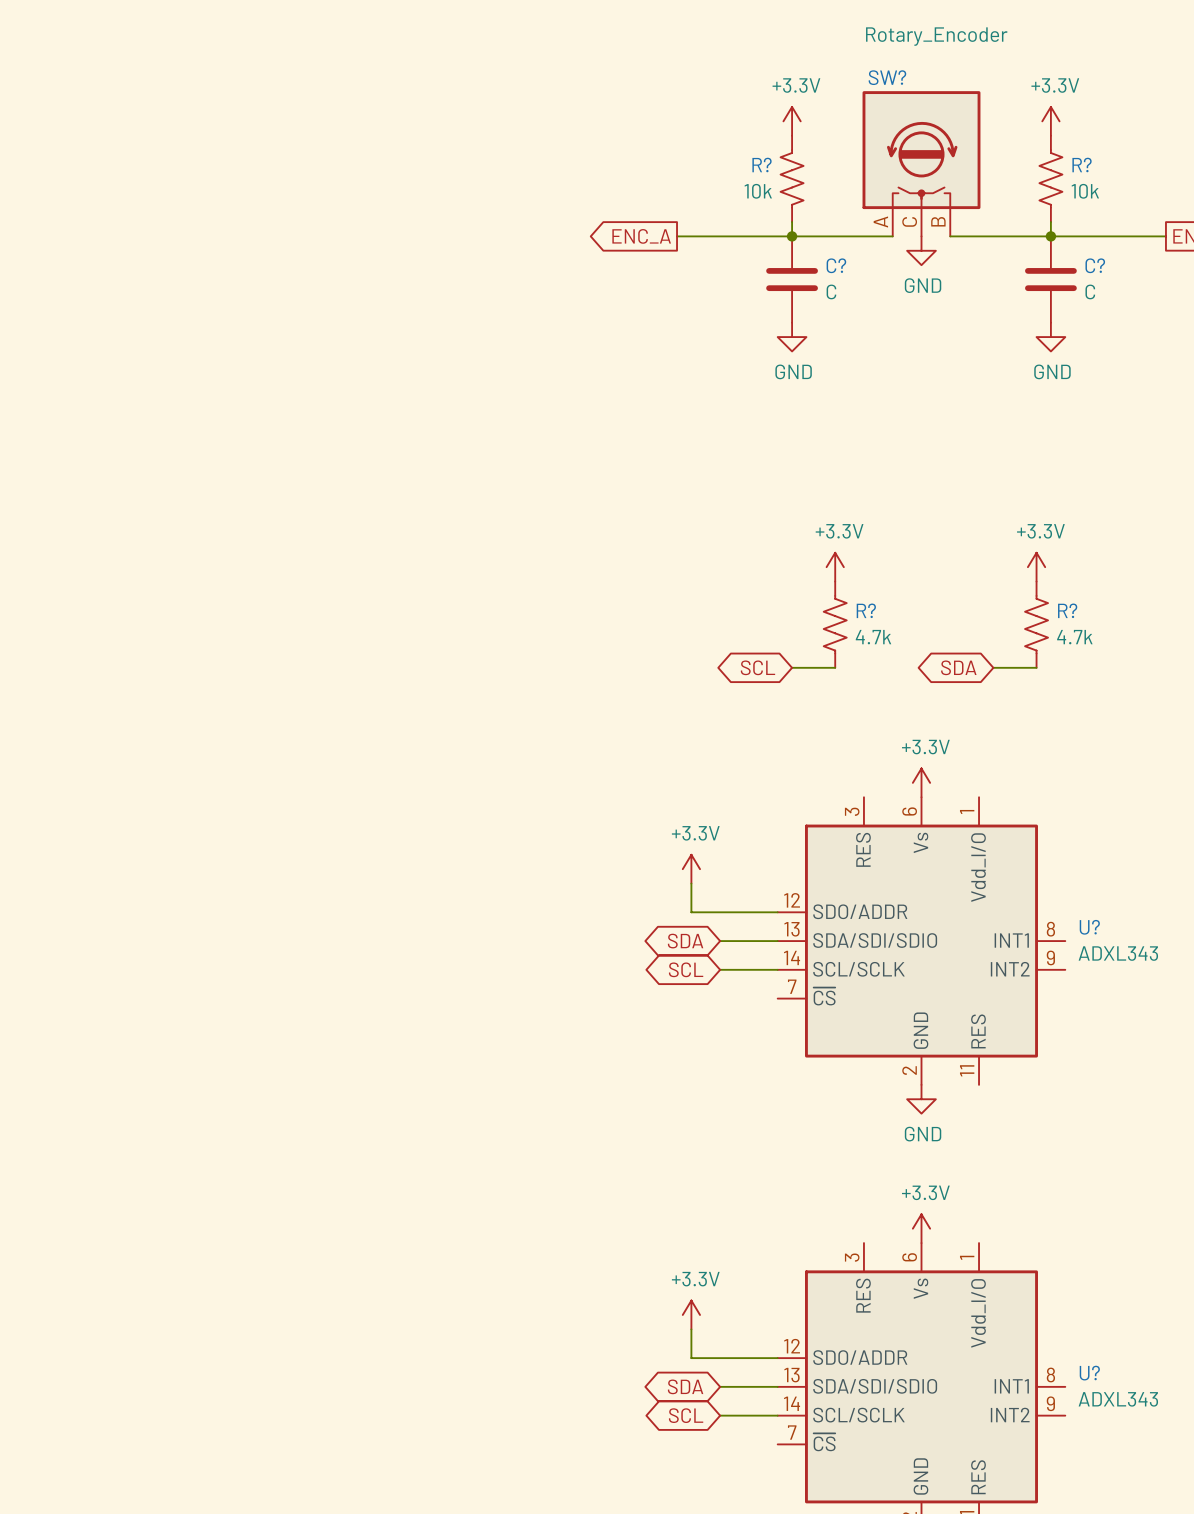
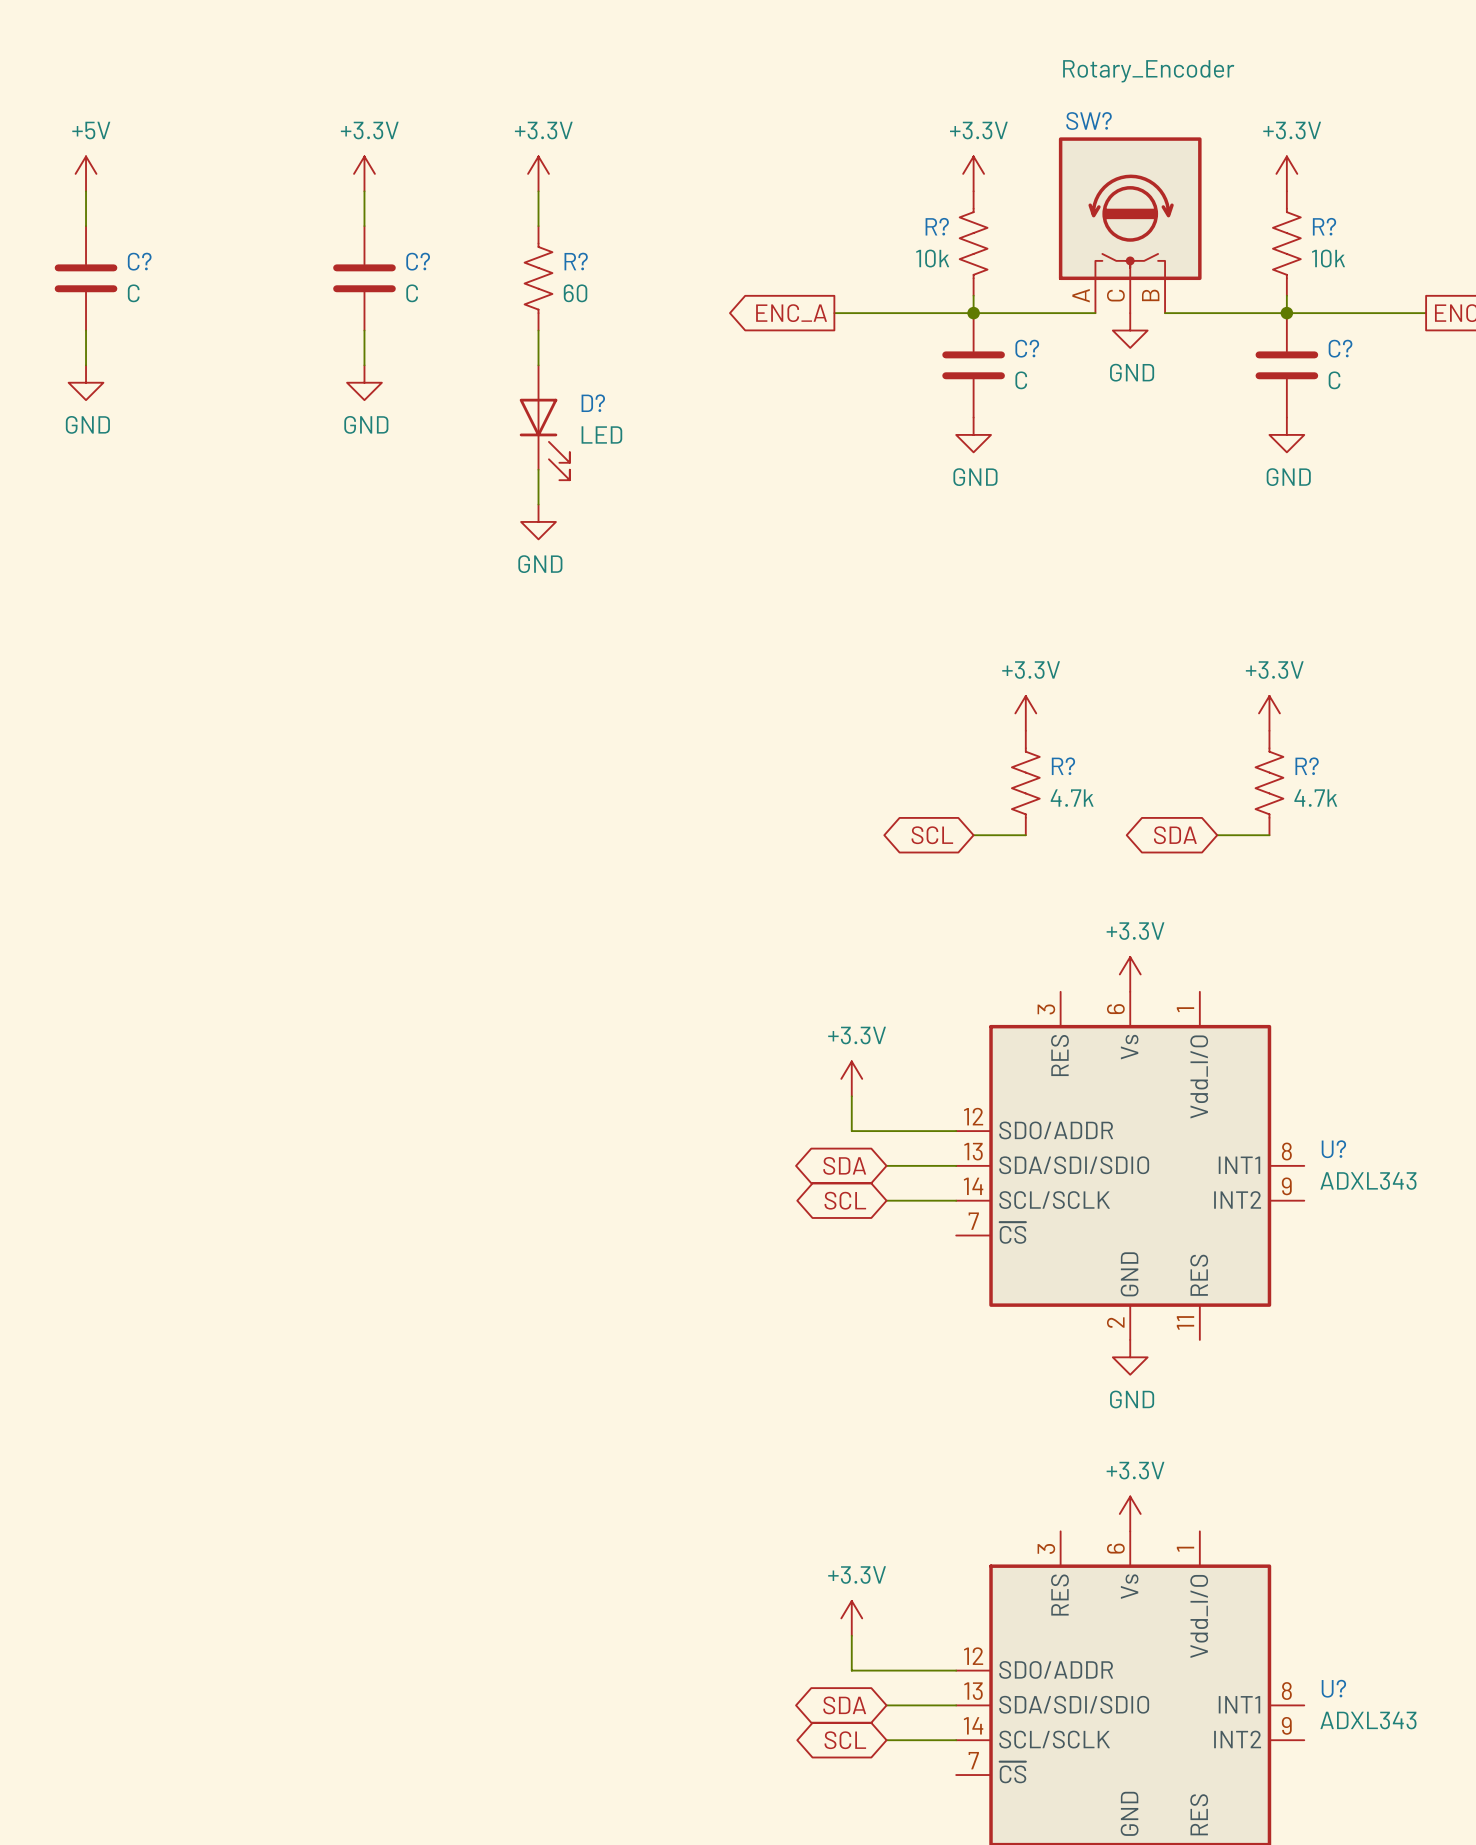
power symbol: none -> +5V (86, 173)
power symbol: none -> +3.3V (364, 173)
power symbol: none -> +3.3V (538, 173)
wire: none -> (86, 191) (86, 226)
wire: none -> (364, 191) (364, 226)
wire: none -> (538, 191) (538, 226)
C?: none -> C (86, 278)
C?: none -> C (364, 278)
R?: none -> 60 (538, 278)
wire: none -> (86, 330) (86, 365)
wire: none -> (364, 330) (364, 365)
wire: none -> (538, 330) (538, 365)
power symbol: none -> GND (86, 382)
power symbol: none -> GND (364, 382)
D?: none -> LED (544, 422)
wire: none -> (538, 469) (538, 504)
power symbol: none -> GND (538, 521)

